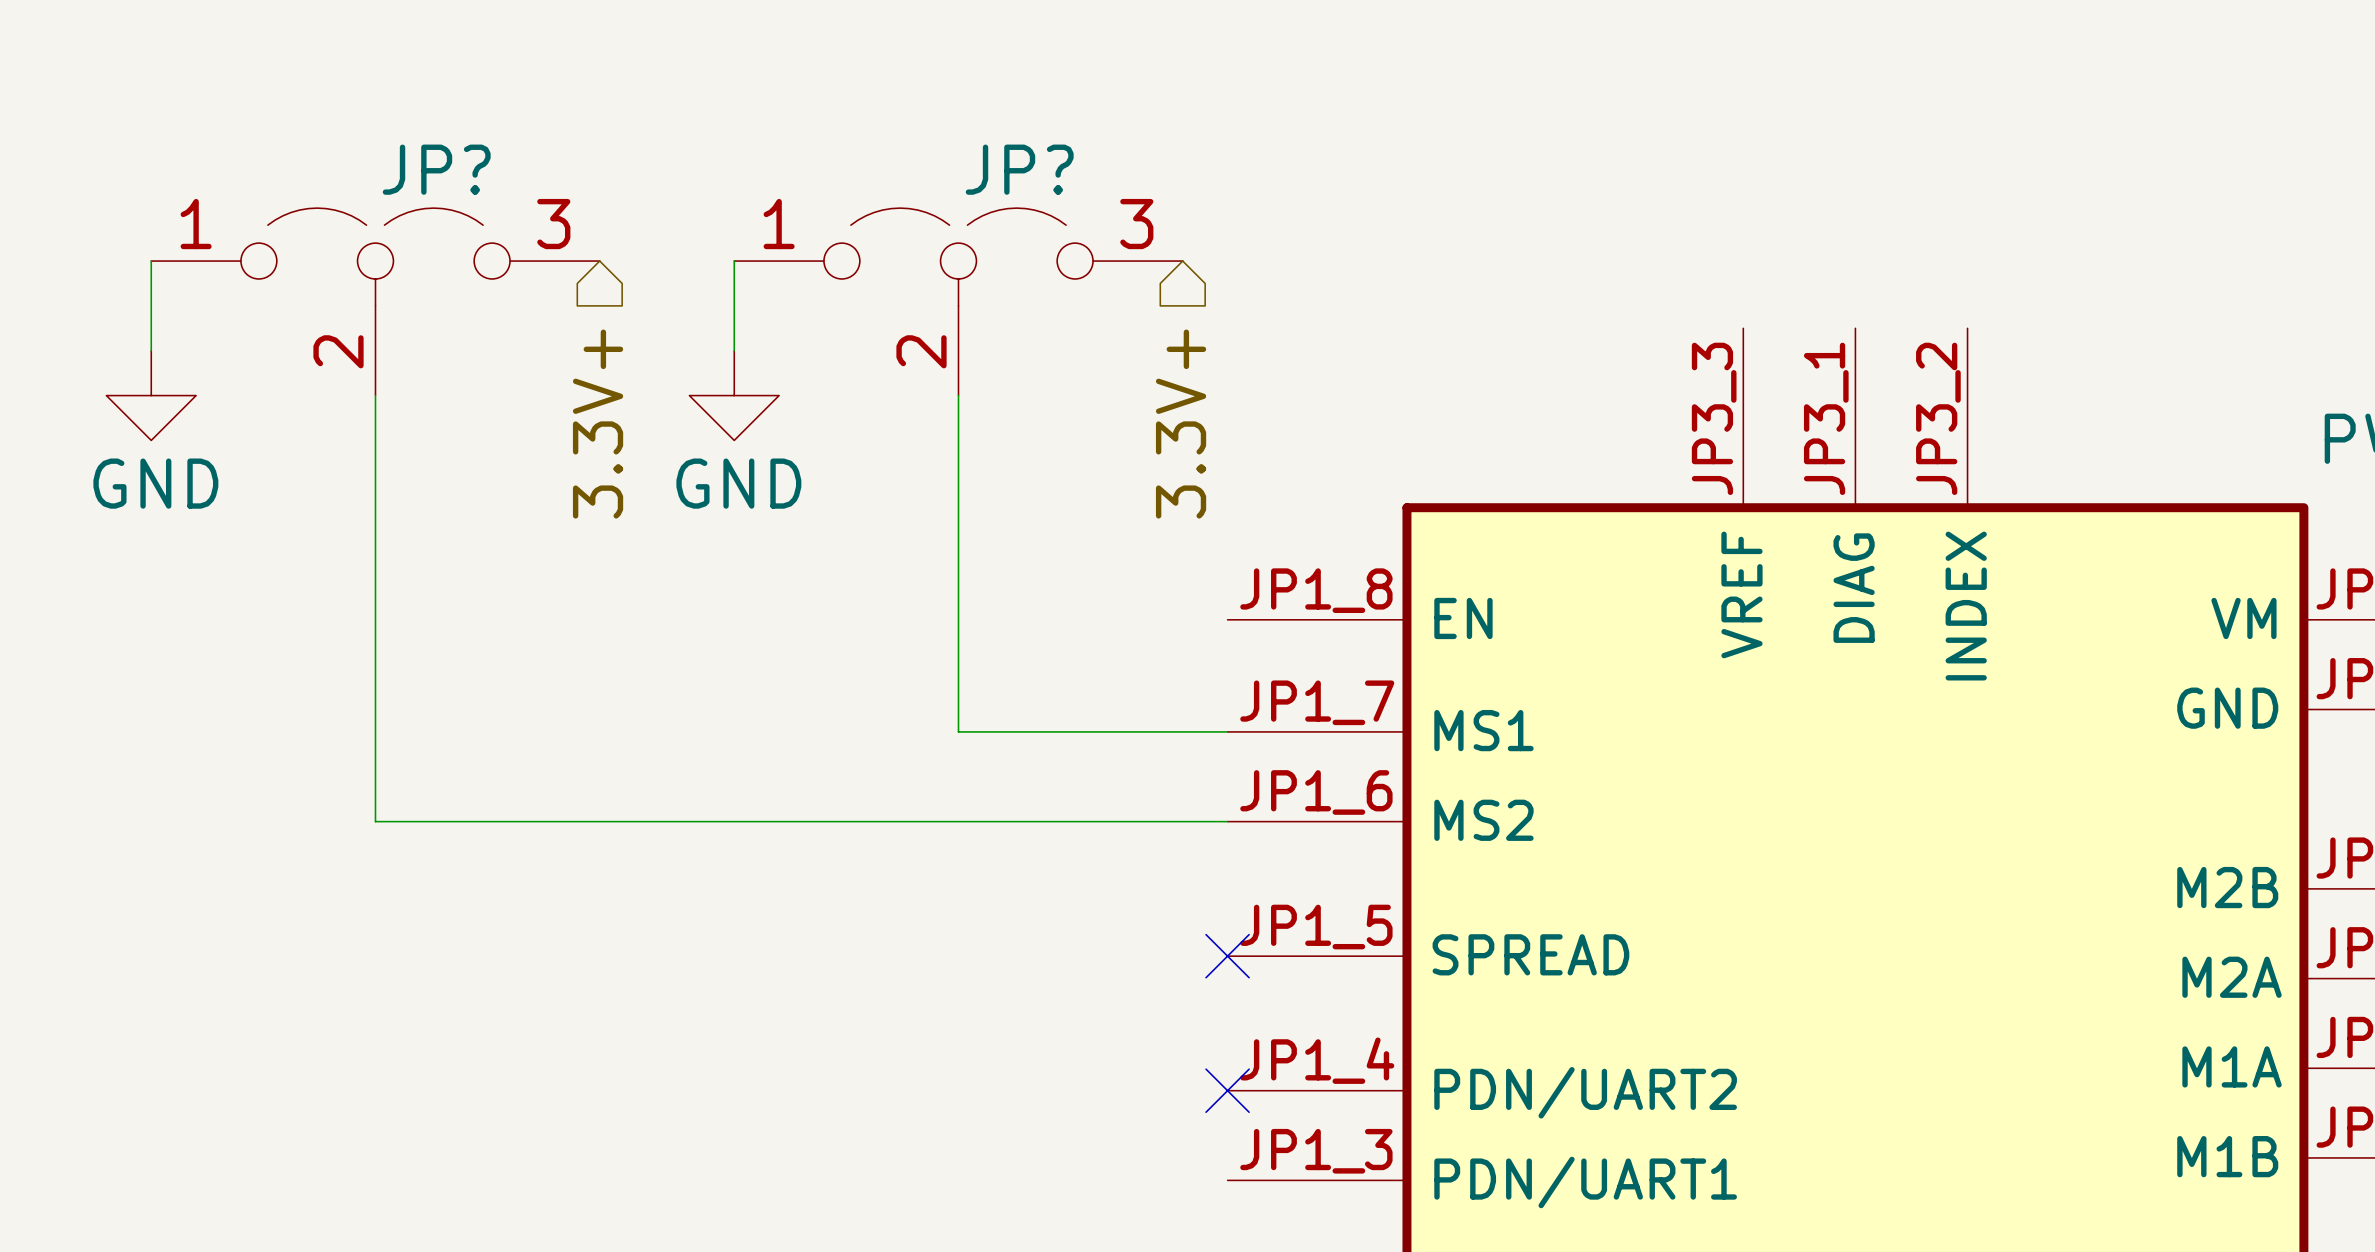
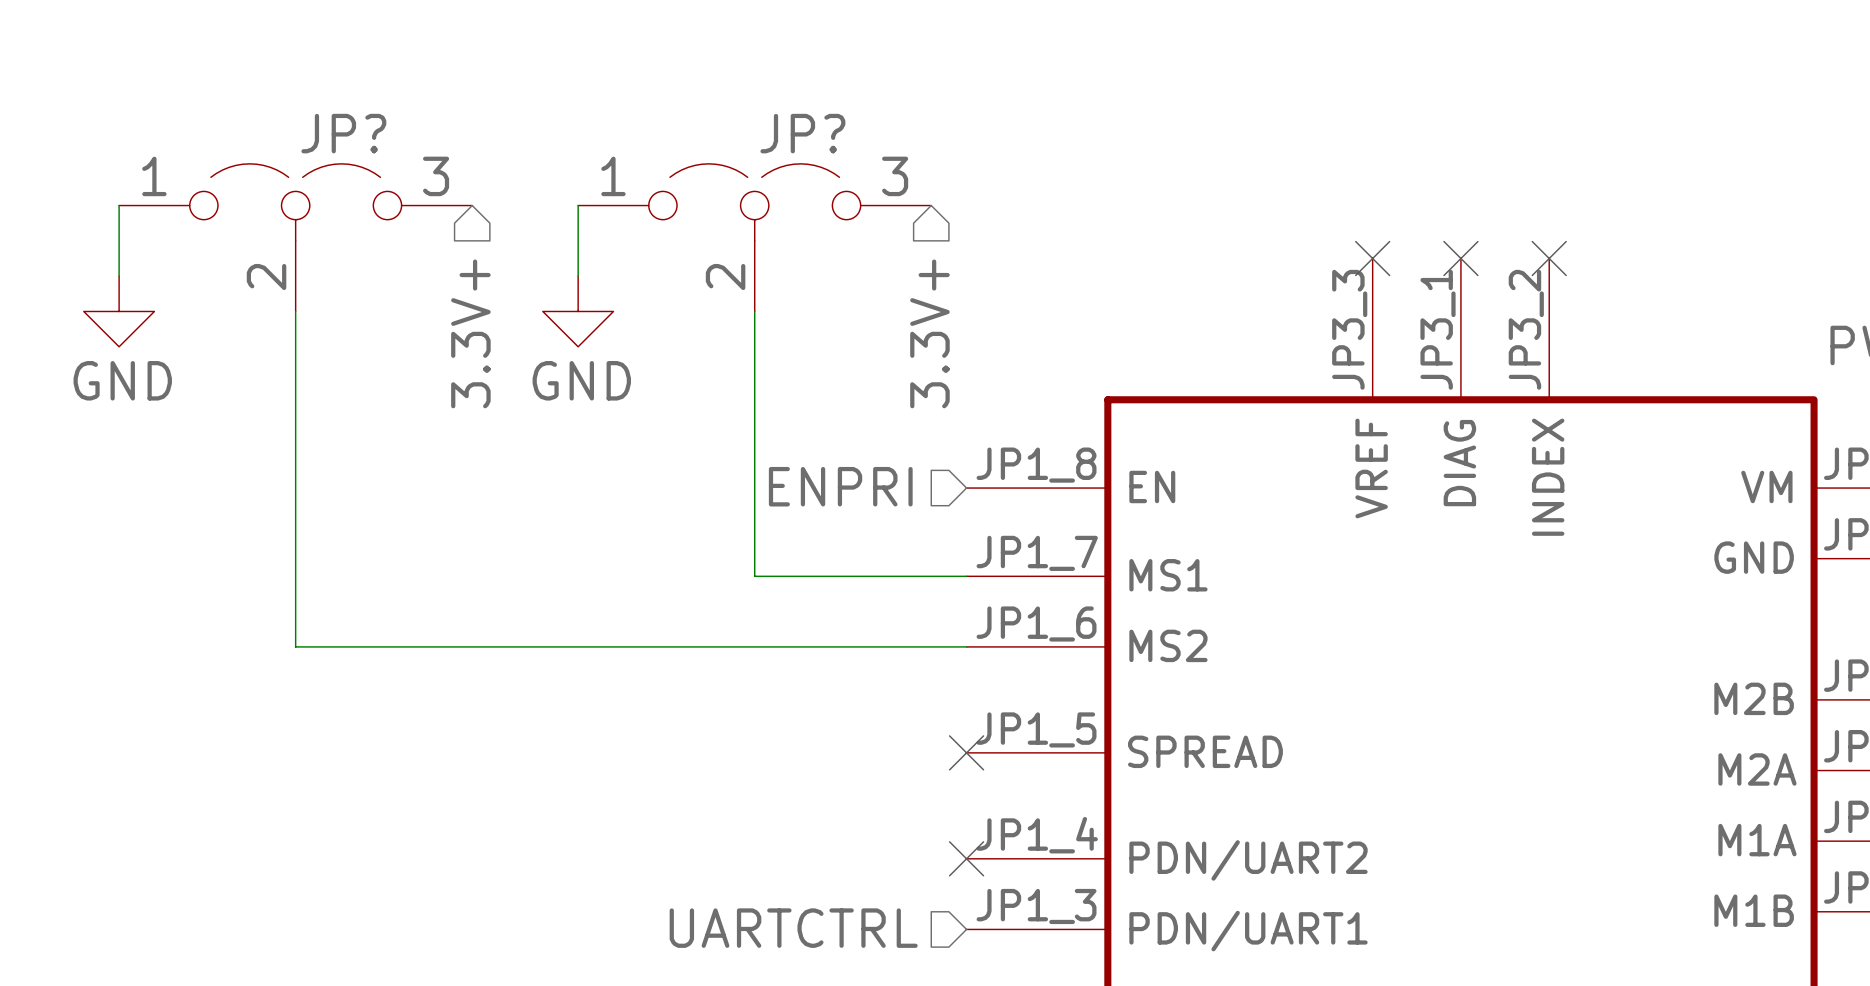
no-connect mark: none -> (1372, 258)
no-connect mark: none -> (1460, 258)
no-connect mark: none -> (1549, 258)
hierarchical label: none -> ENPRI (840, 486)
hierarchical label: none -> UARTCTRL (793, 928)

